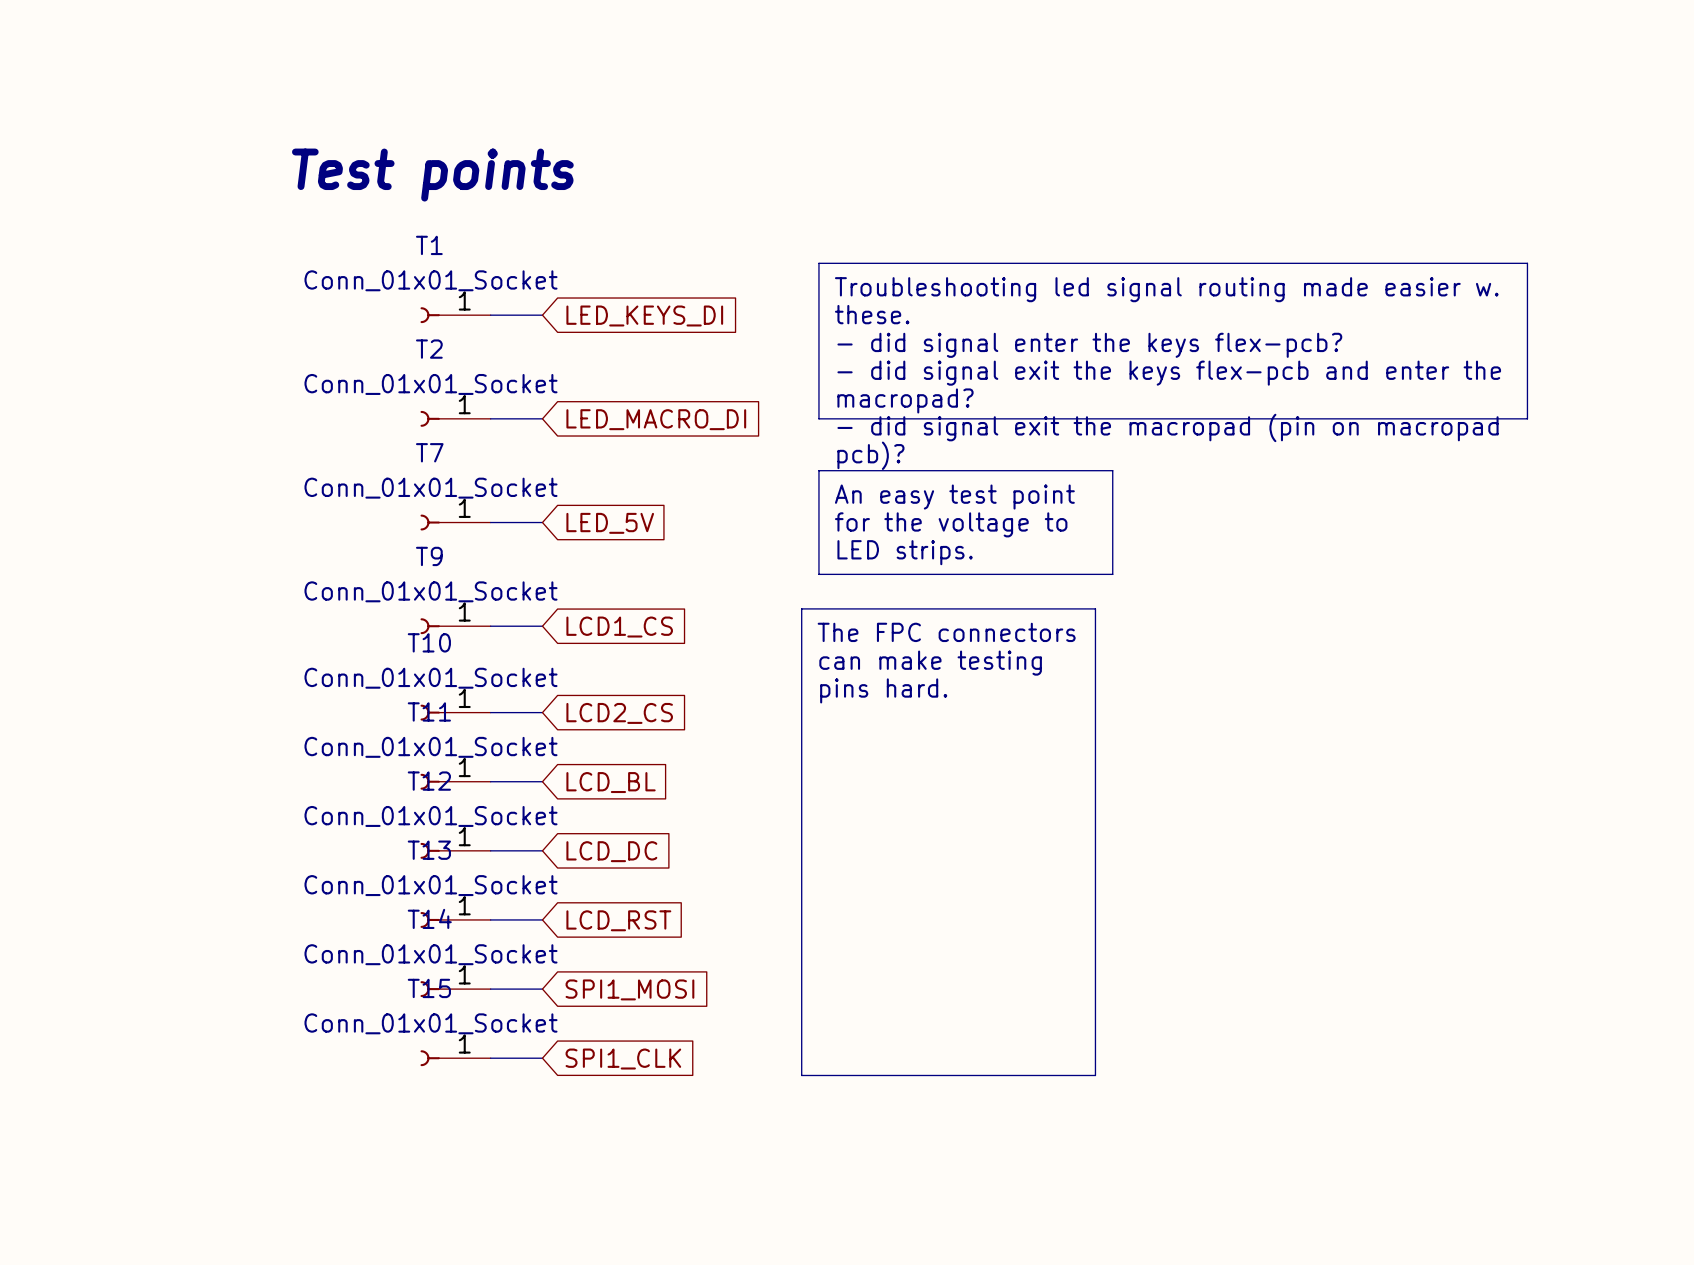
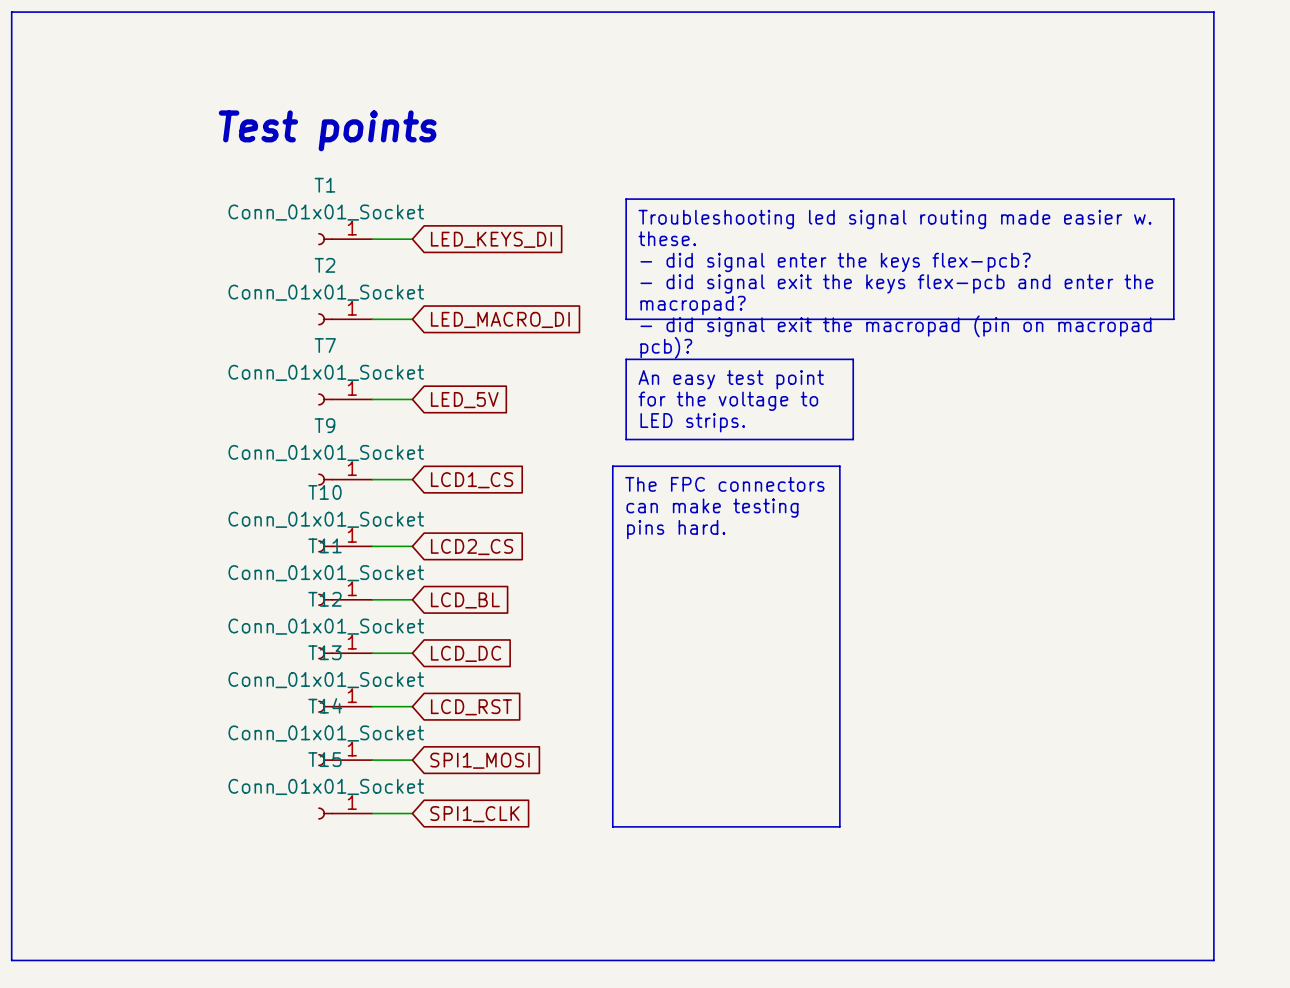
line: none -> (11, 12) (1213, 12) (1213, 960) (11, 960) (11, 12)

